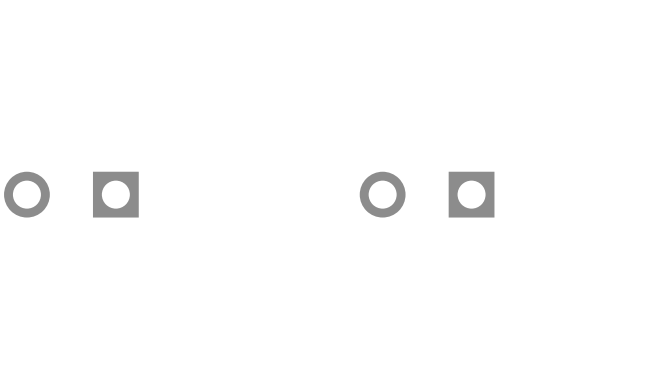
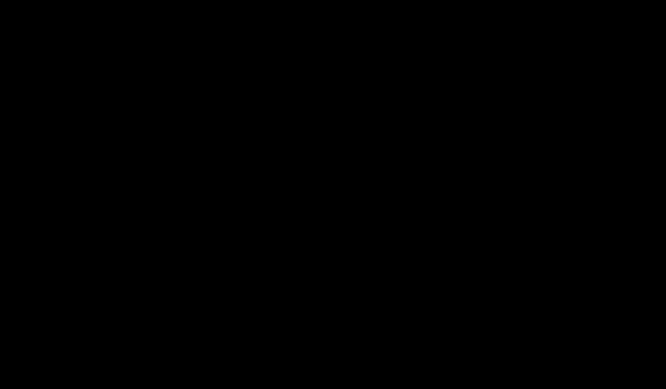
part: (71, 194) -> none
part: (427, 194) -> none

